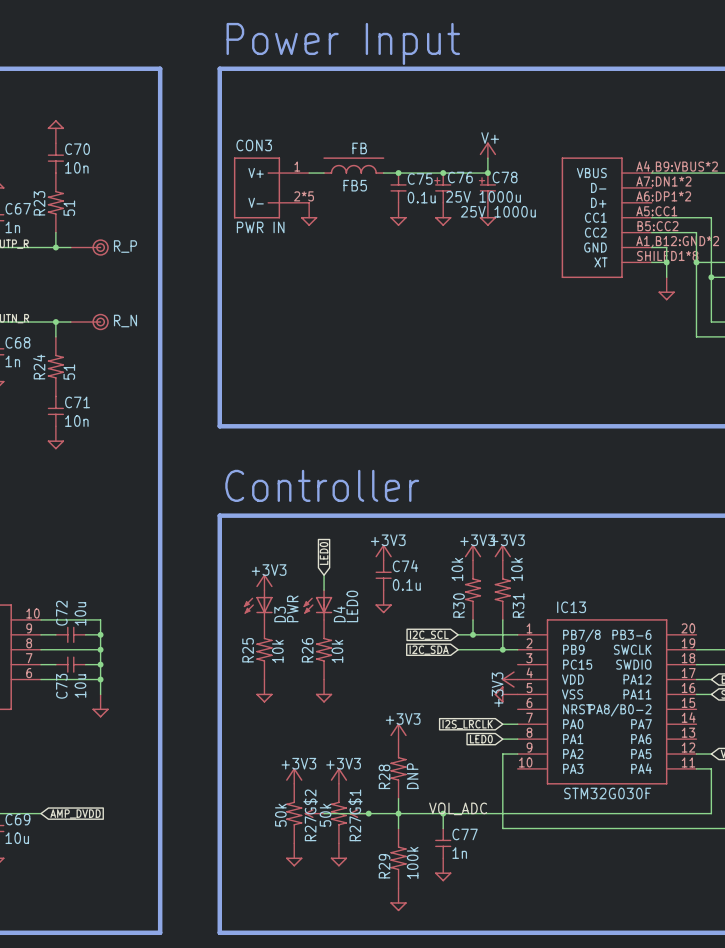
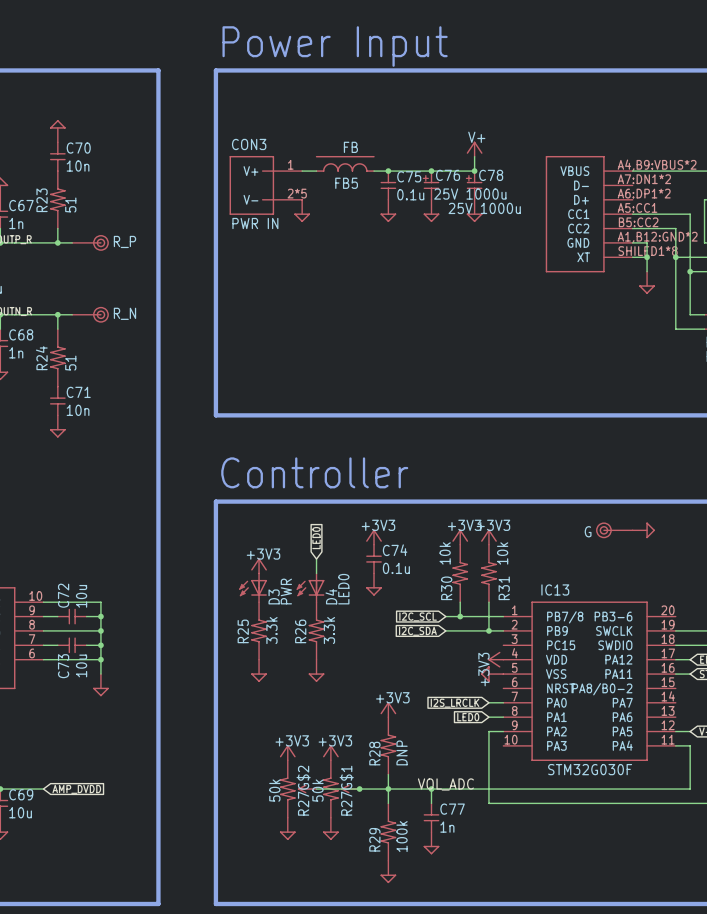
part: none -> G (614, 530)
power symbol: none -> (643, 530)
R25 value: 10k (277, 651) -> 3.3k (271, 630)
R26 value: 10k (337, 651) -> 3.3k (329, 630)

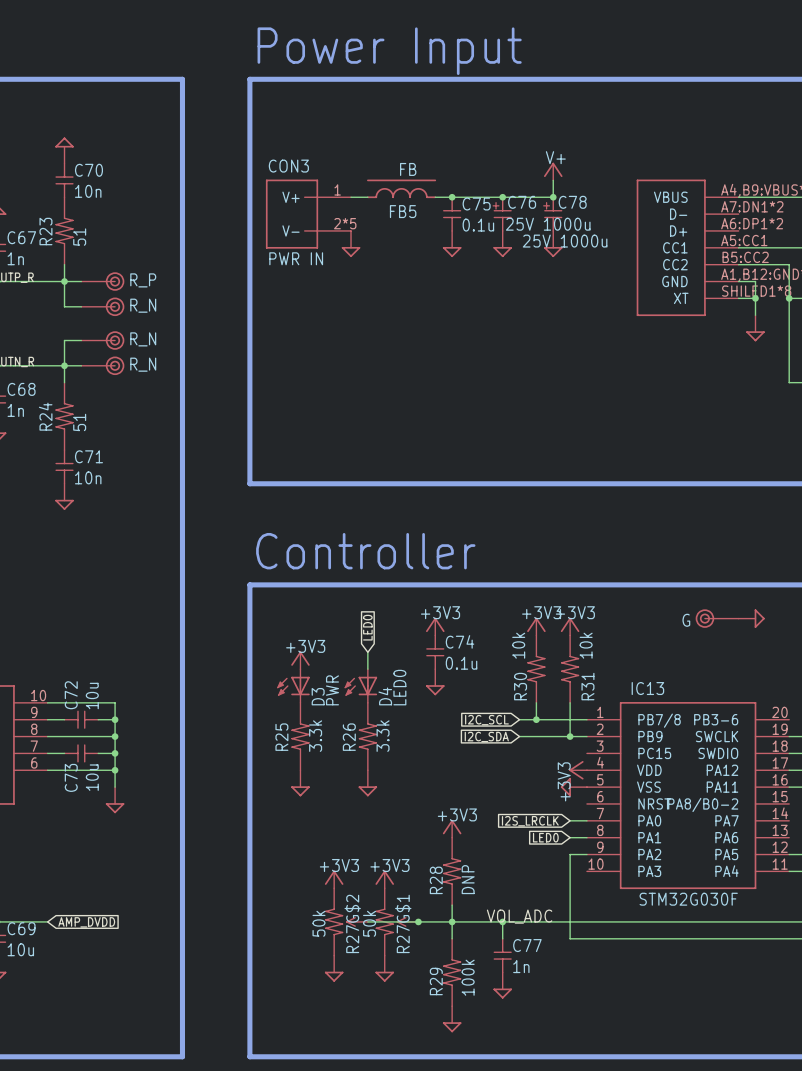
wire: none -> (64, 281) (64, 306) (81, 306)
part: none -> R_N (102, 306)
wire: none -> (81, 340) (64, 340) (64, 365)
part: none -> R_N (102, 340)

